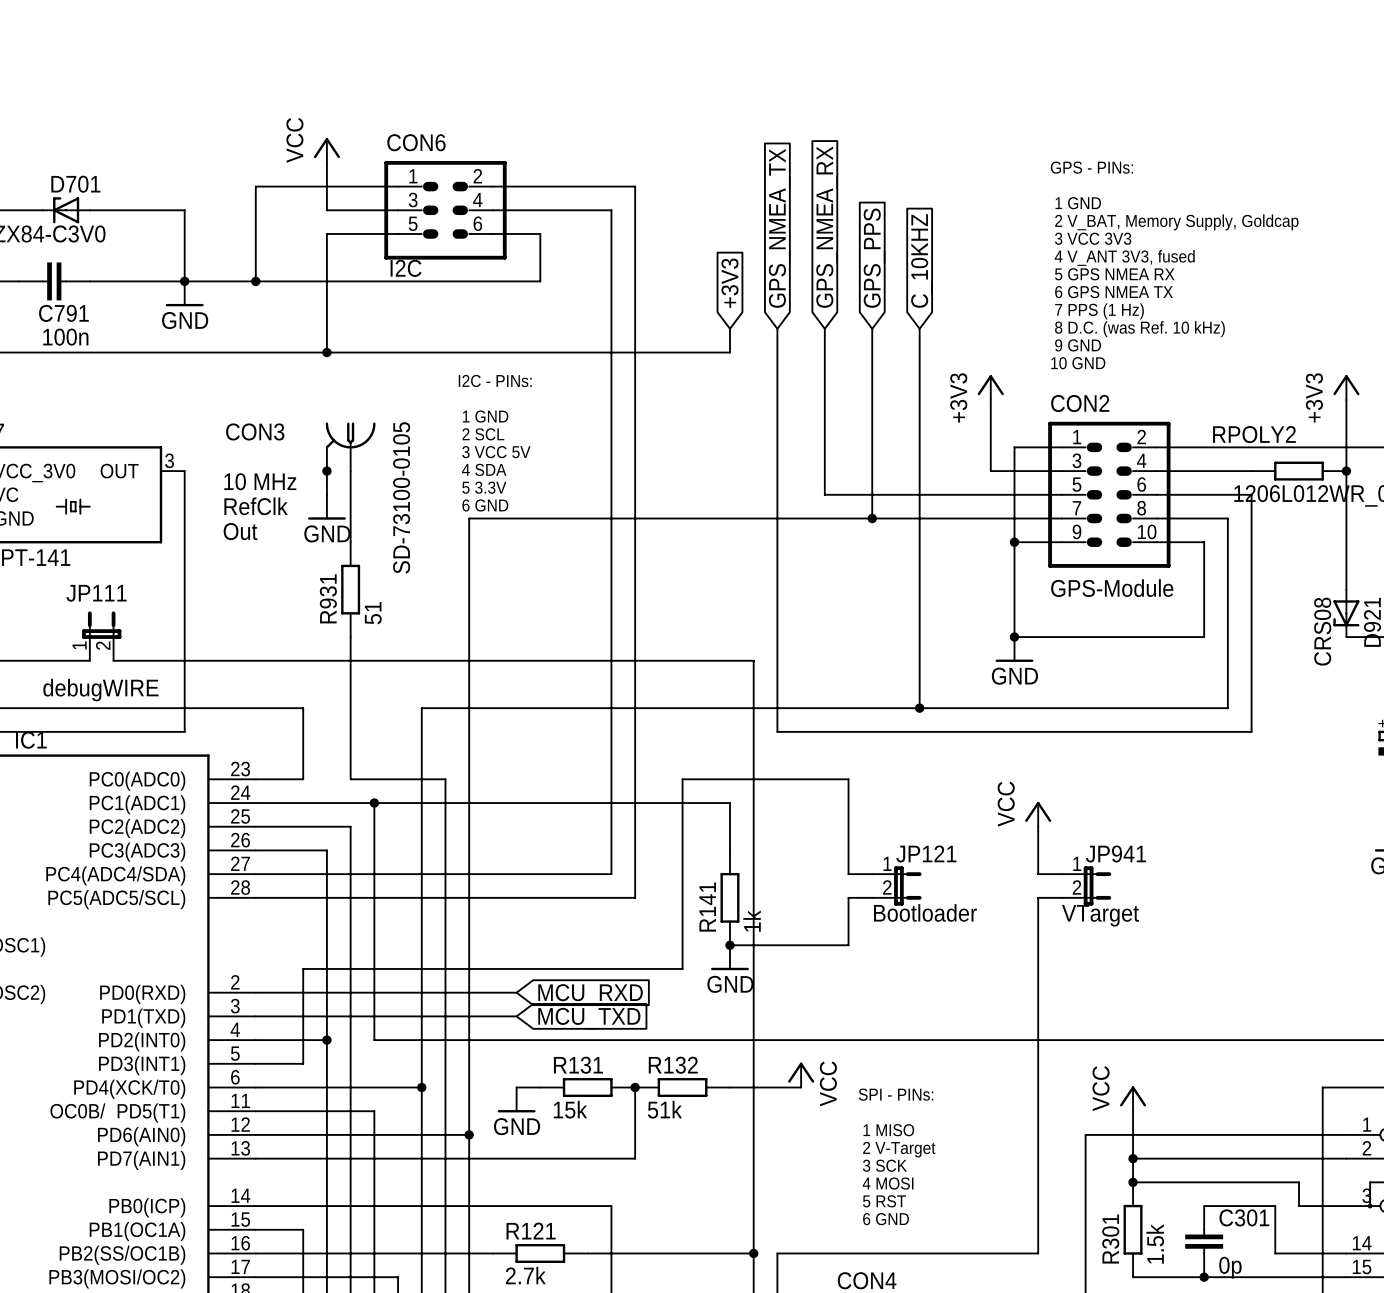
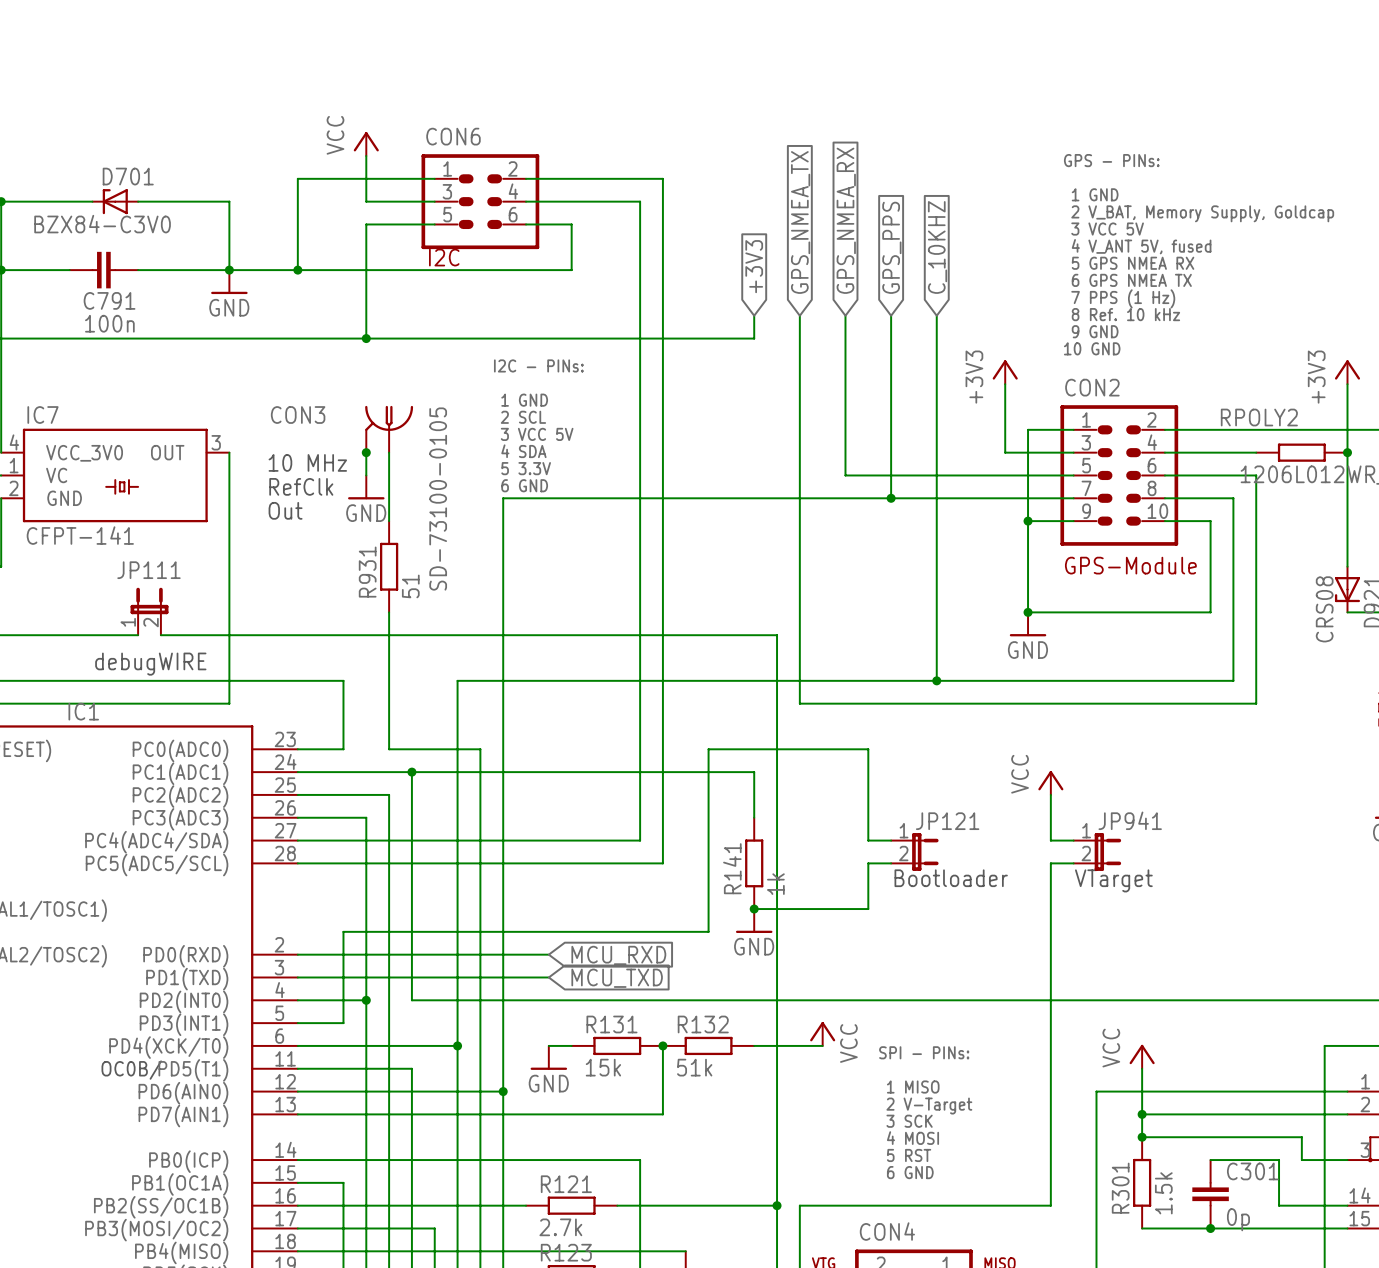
text: 3 VCC 3V3 (1093, 238) -> 3 VCC 5V (1107, 229)
text: 4 V_ANT 3V3, fused (1124, 257) -> 4 V_ANT 5V, fused (1141, 246)
text: 8 D.C. (was Ref. 10 kHz) (1139, 329) -> 8 Ref. 10 kHz (1125, 314)

